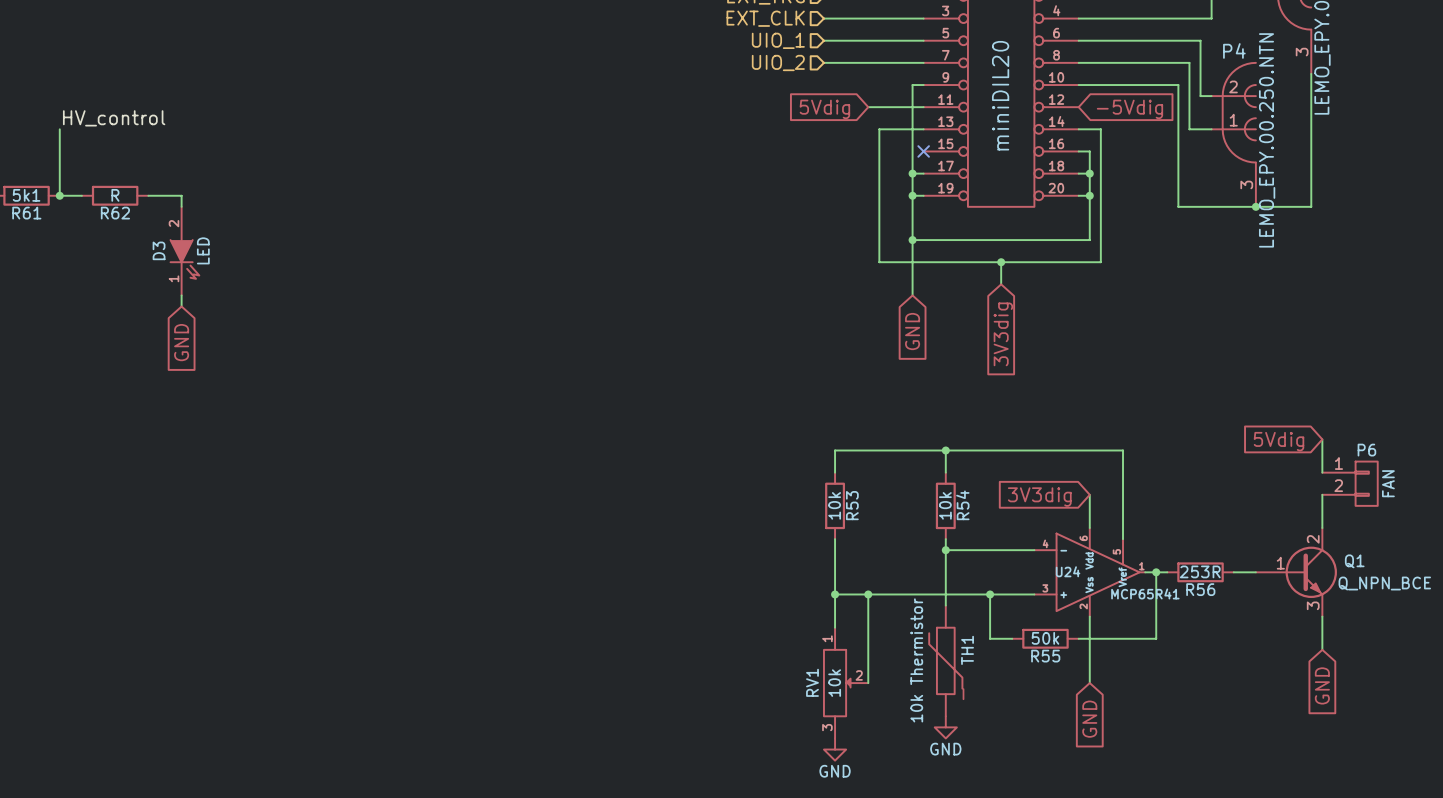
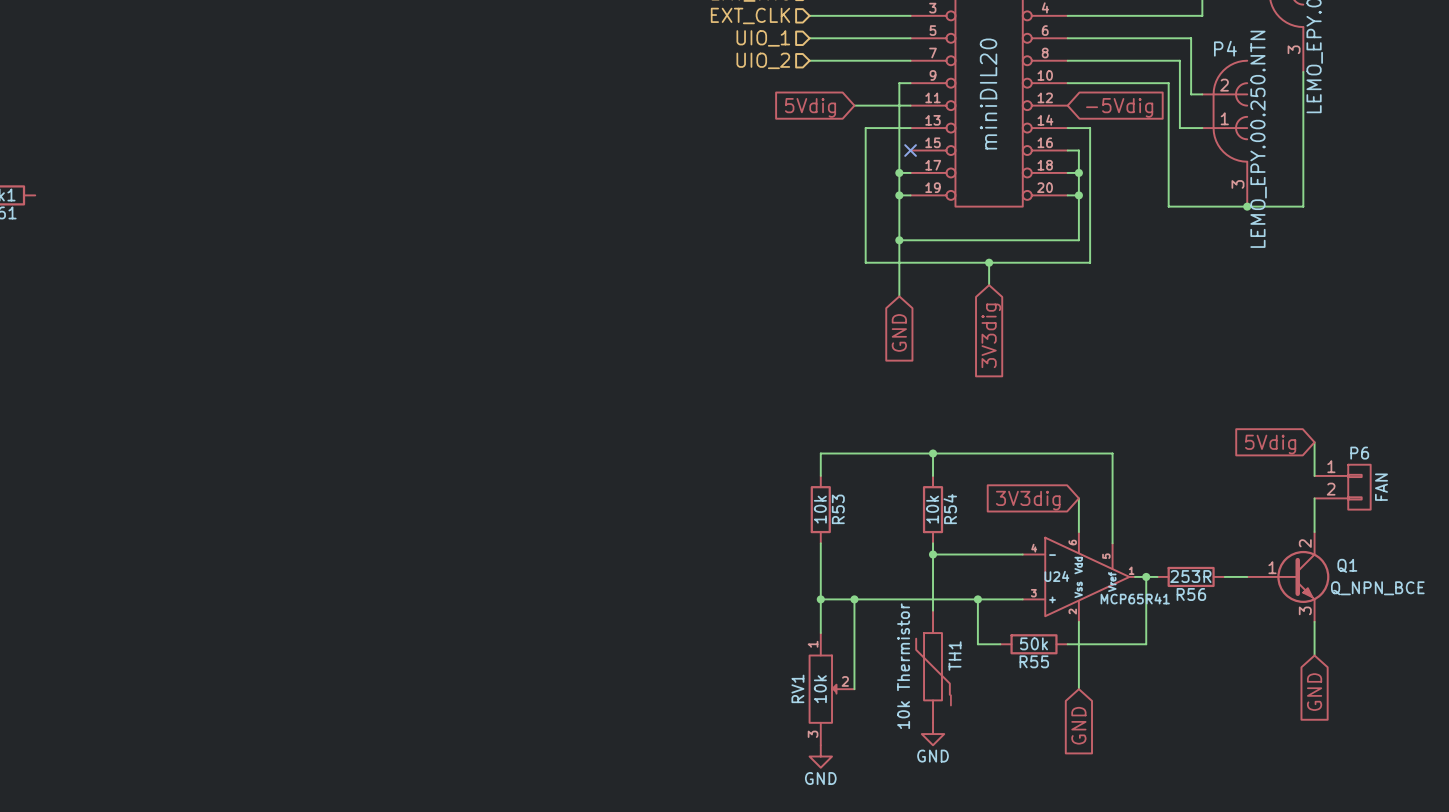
label: HV_control (114, 118) -> none
wire: (59, 129) (59, 195) (81, 195) -> none
junction: (59, 195) -> none
R62: R (115, 195) -> none
wire: (148, 195) (181, 195) (181, 206) -> none
D3: LED (184, 251) -> none
wire: (181, 295) (181, 306) -> none
global label: GND (181, 342) -> none

